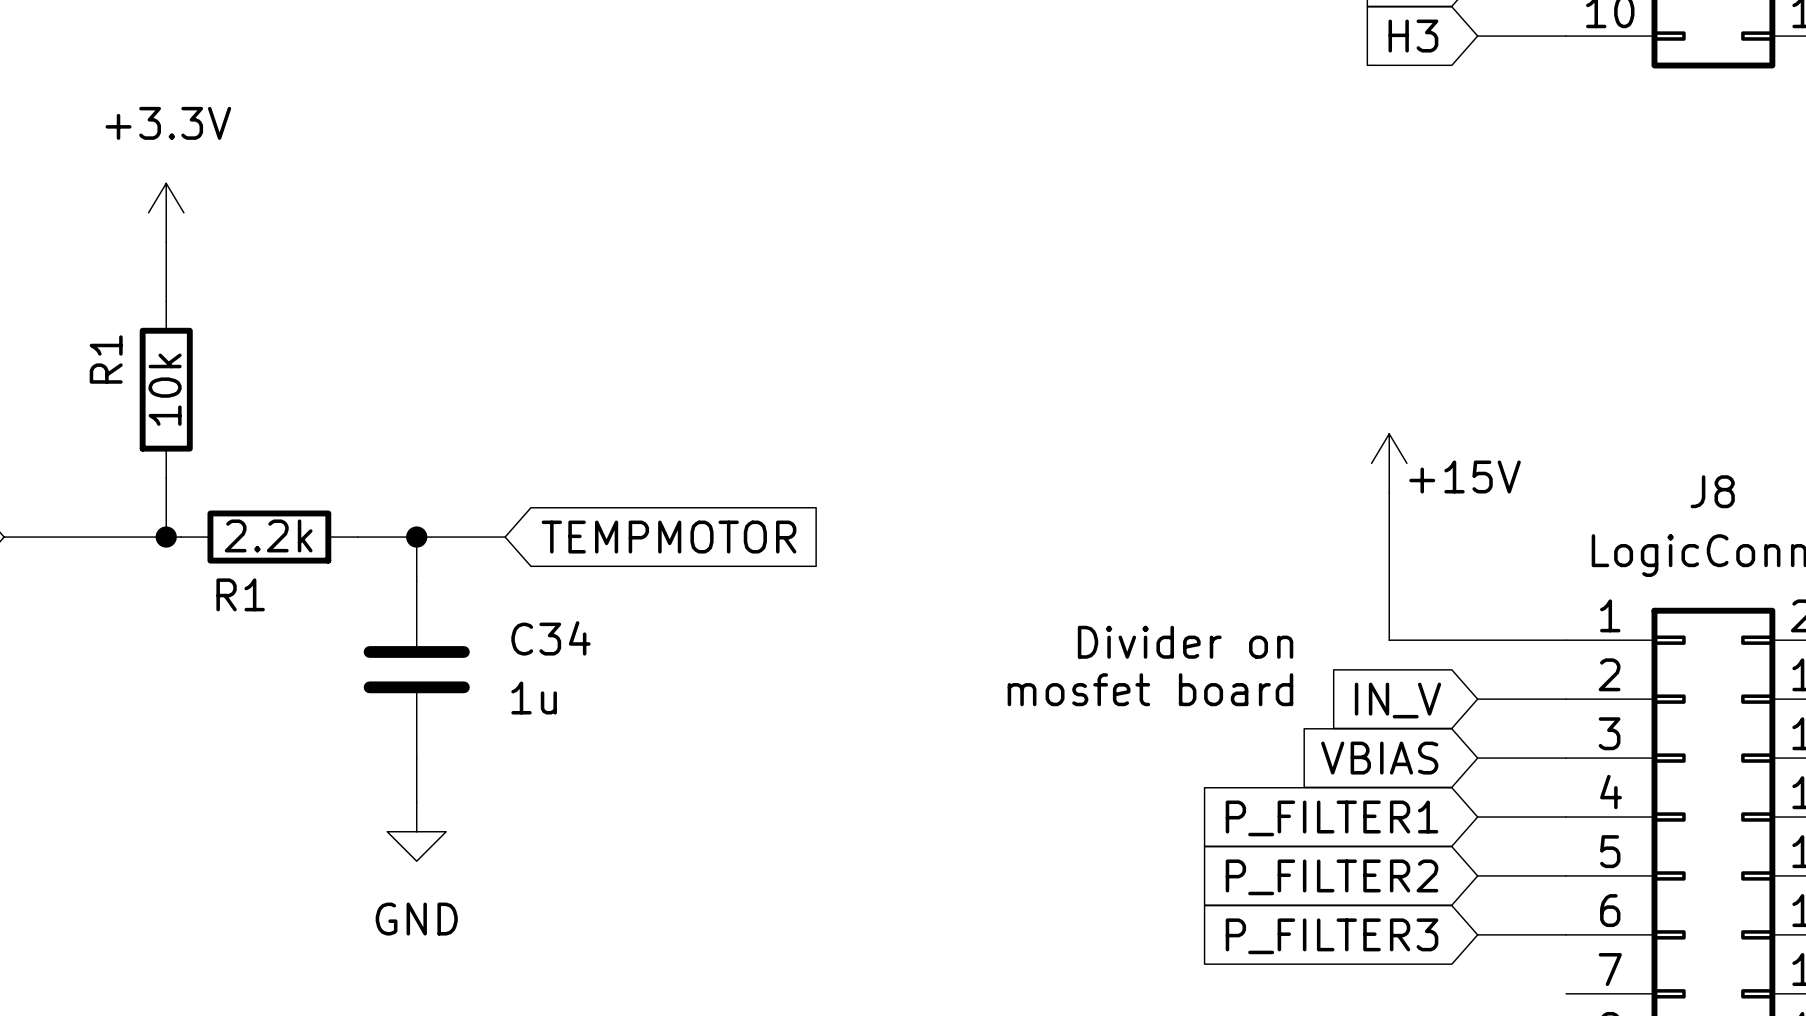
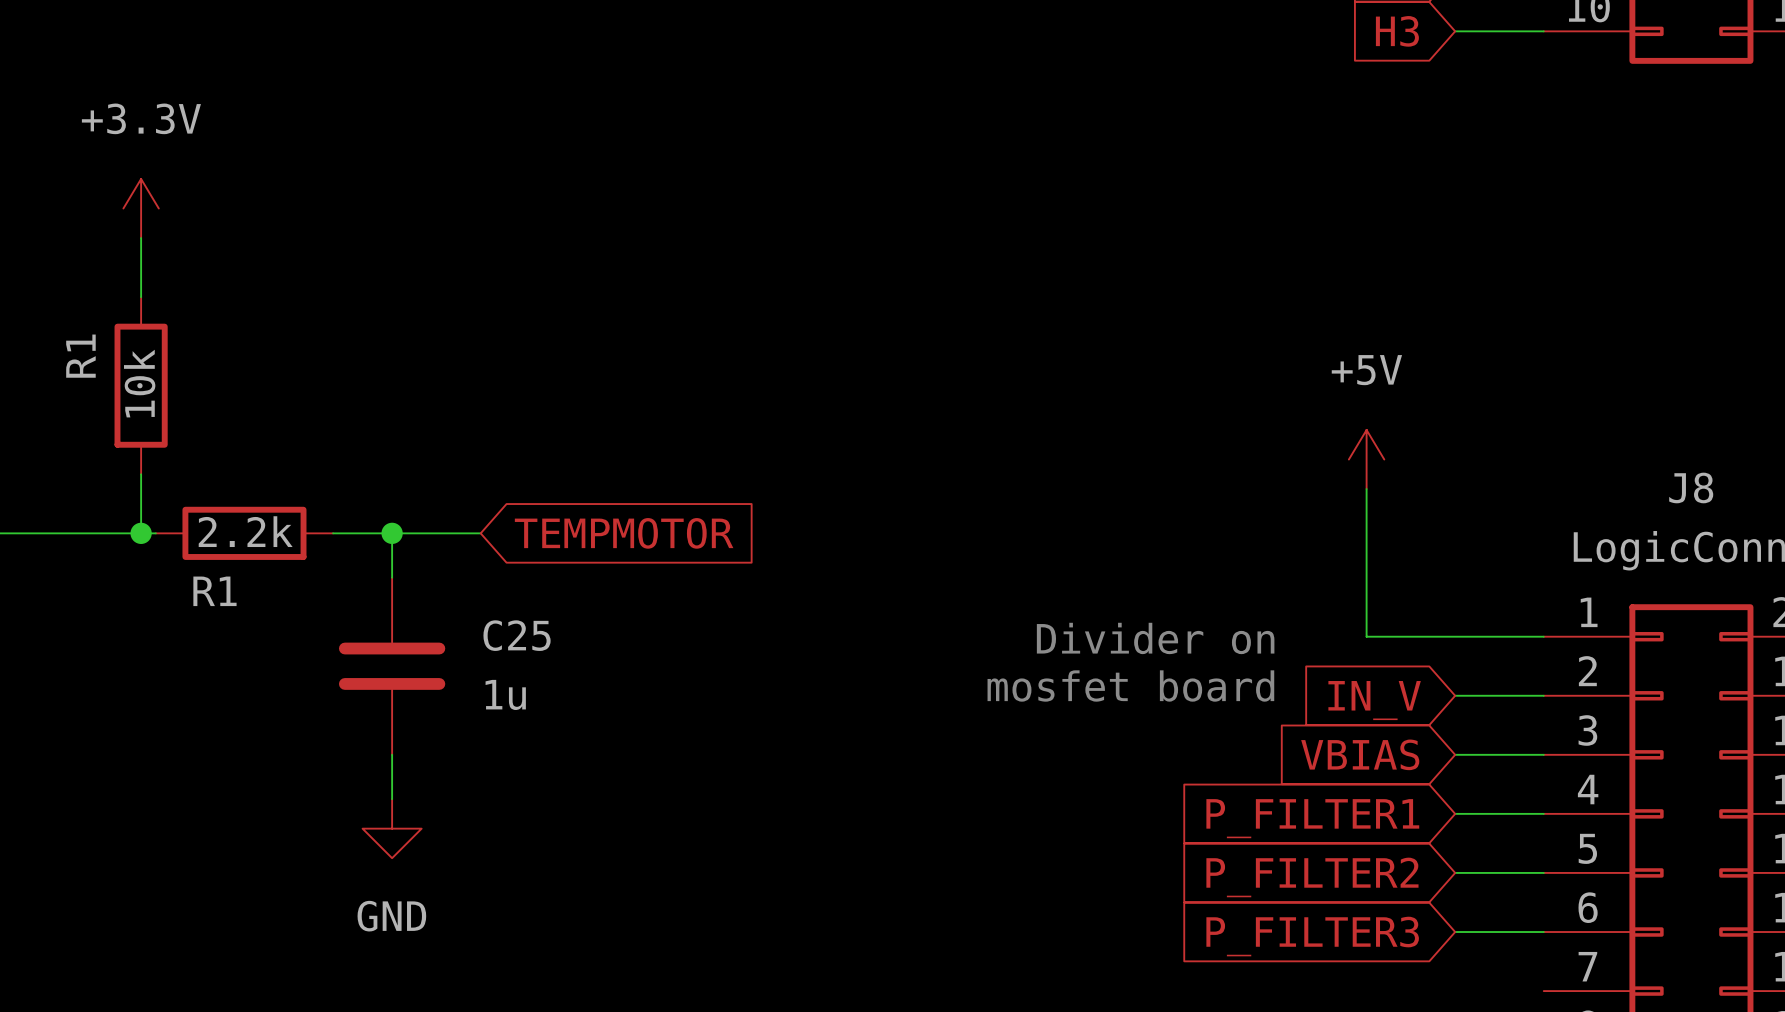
power symbol: +15V (1389, 463) -> +5V (1366, 459)
C34 name: C34 (550, 638) -> C25 (517, 635)

